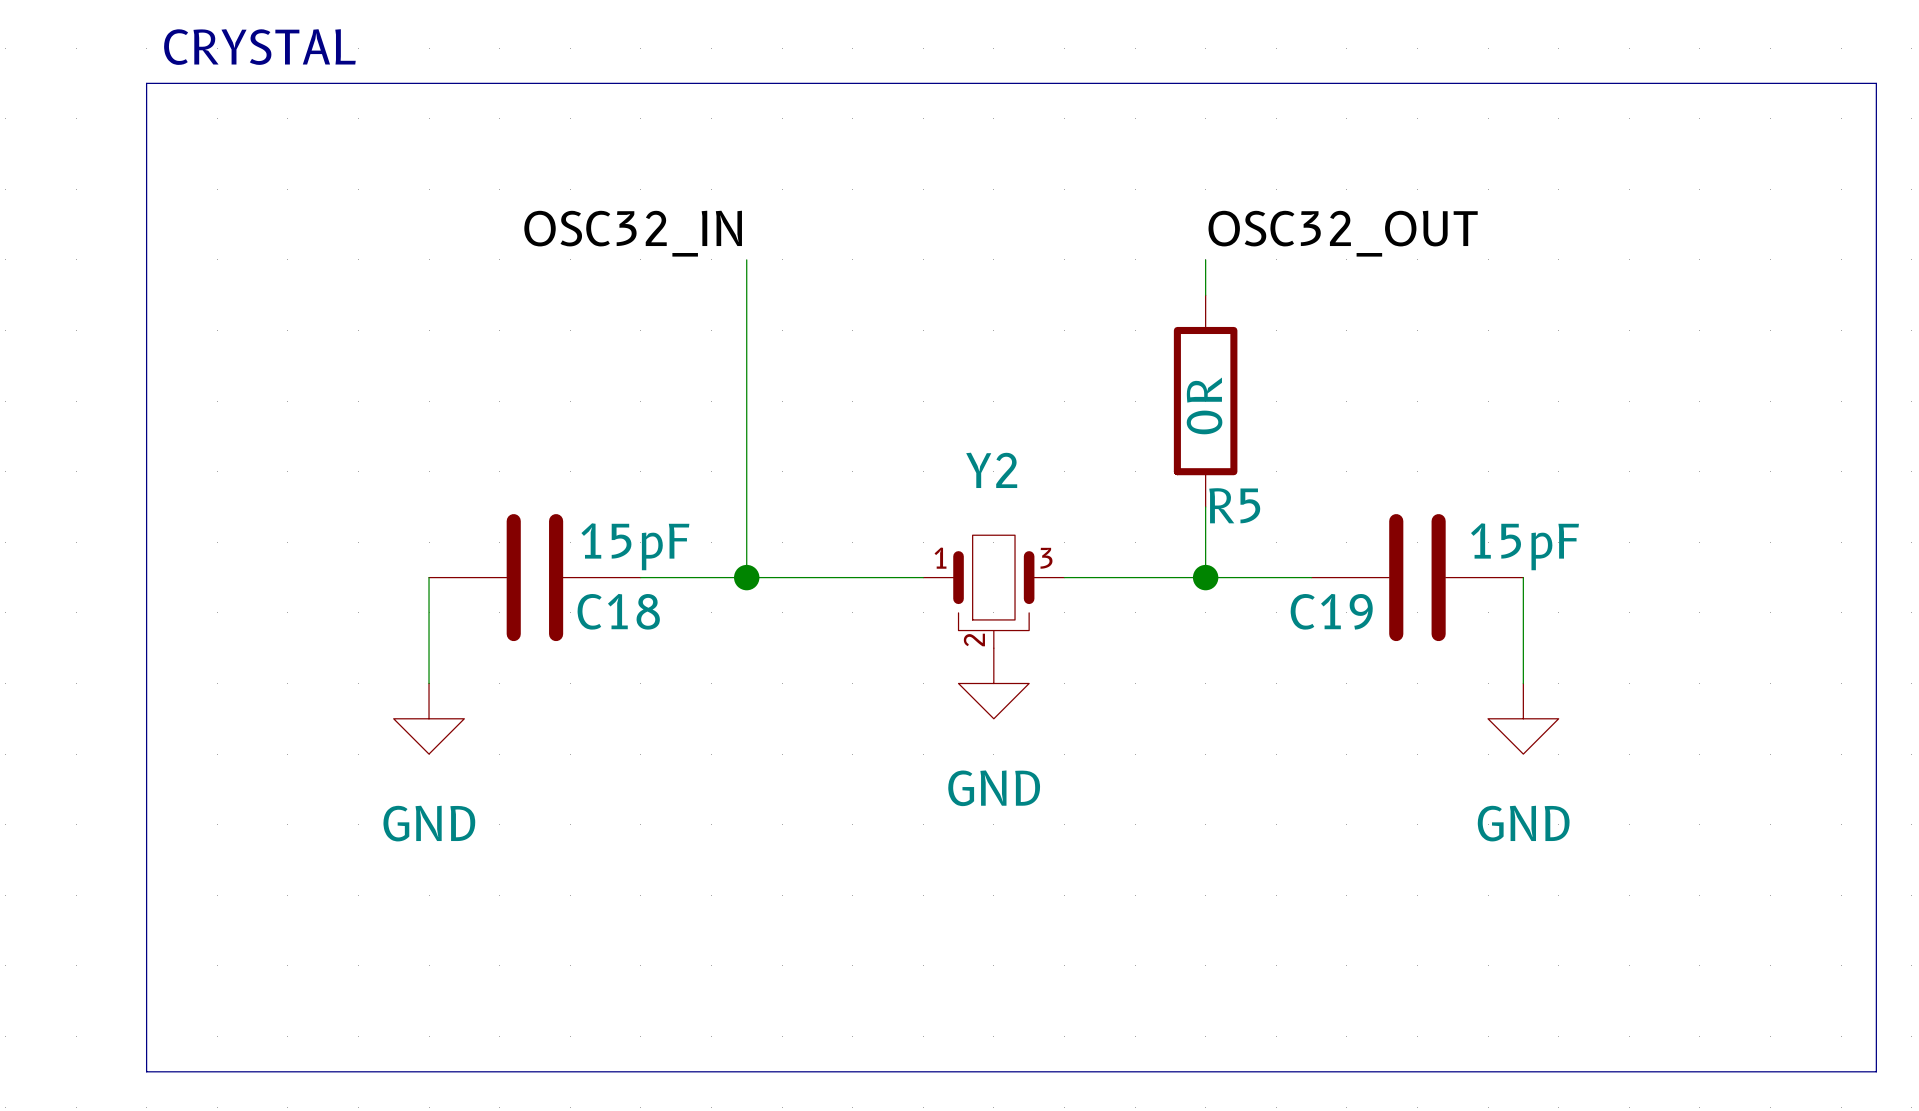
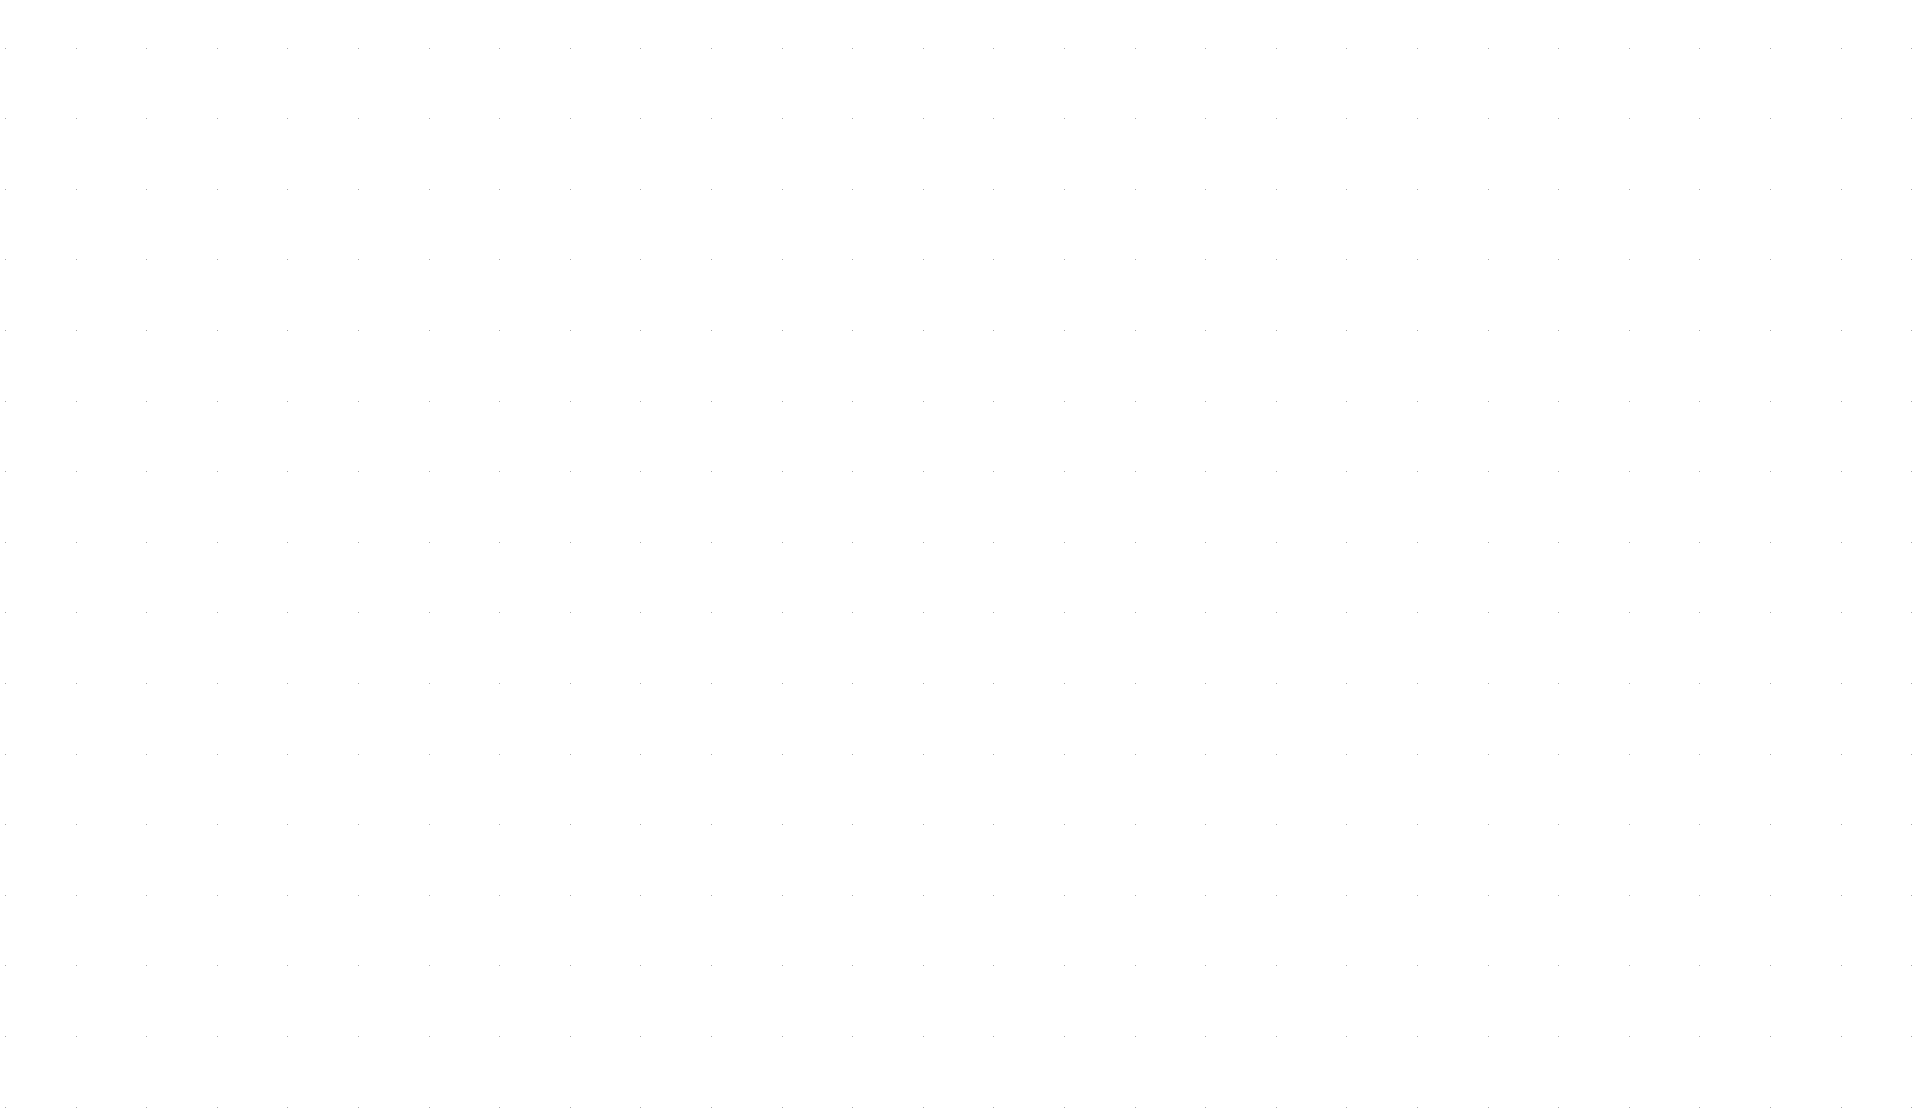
text: CRYSTAL (259, 47) -> none
line: (146, 83) (1876, 83) (1876, 1071) (146, 1071) (146, 83) -> none
label: OSC32_IN (633, 233) -> none
label: OSC32_OUT (1343, 233) -> none
wire: (746, 259) (746, 577) -> none
wire: (1205, 259) (1205, 295) -> none
R5: 0R (1205, 401) -> none
wire: (1205, 506) (1205, 577) -> none
wire: (429, 577) (429, 683) -> none
C18: 15pF (534, 577) -> none
wire: (640, 577) (923, 577) -> none
junction: (746, 577) -> none
wire: (1064, 577) (1311, 577) -> none
junction: (1205, 577) -> none
C19: 15pF (1417, 577) -> none
wire: (1523, 577) (1523, 683) -> none
Y2: (993, 591) -> none
power symbol: GND (993, 683) -> none
power symbol: GND (429, 718) -> none
power symbol: GND (1523, 718) -> none

